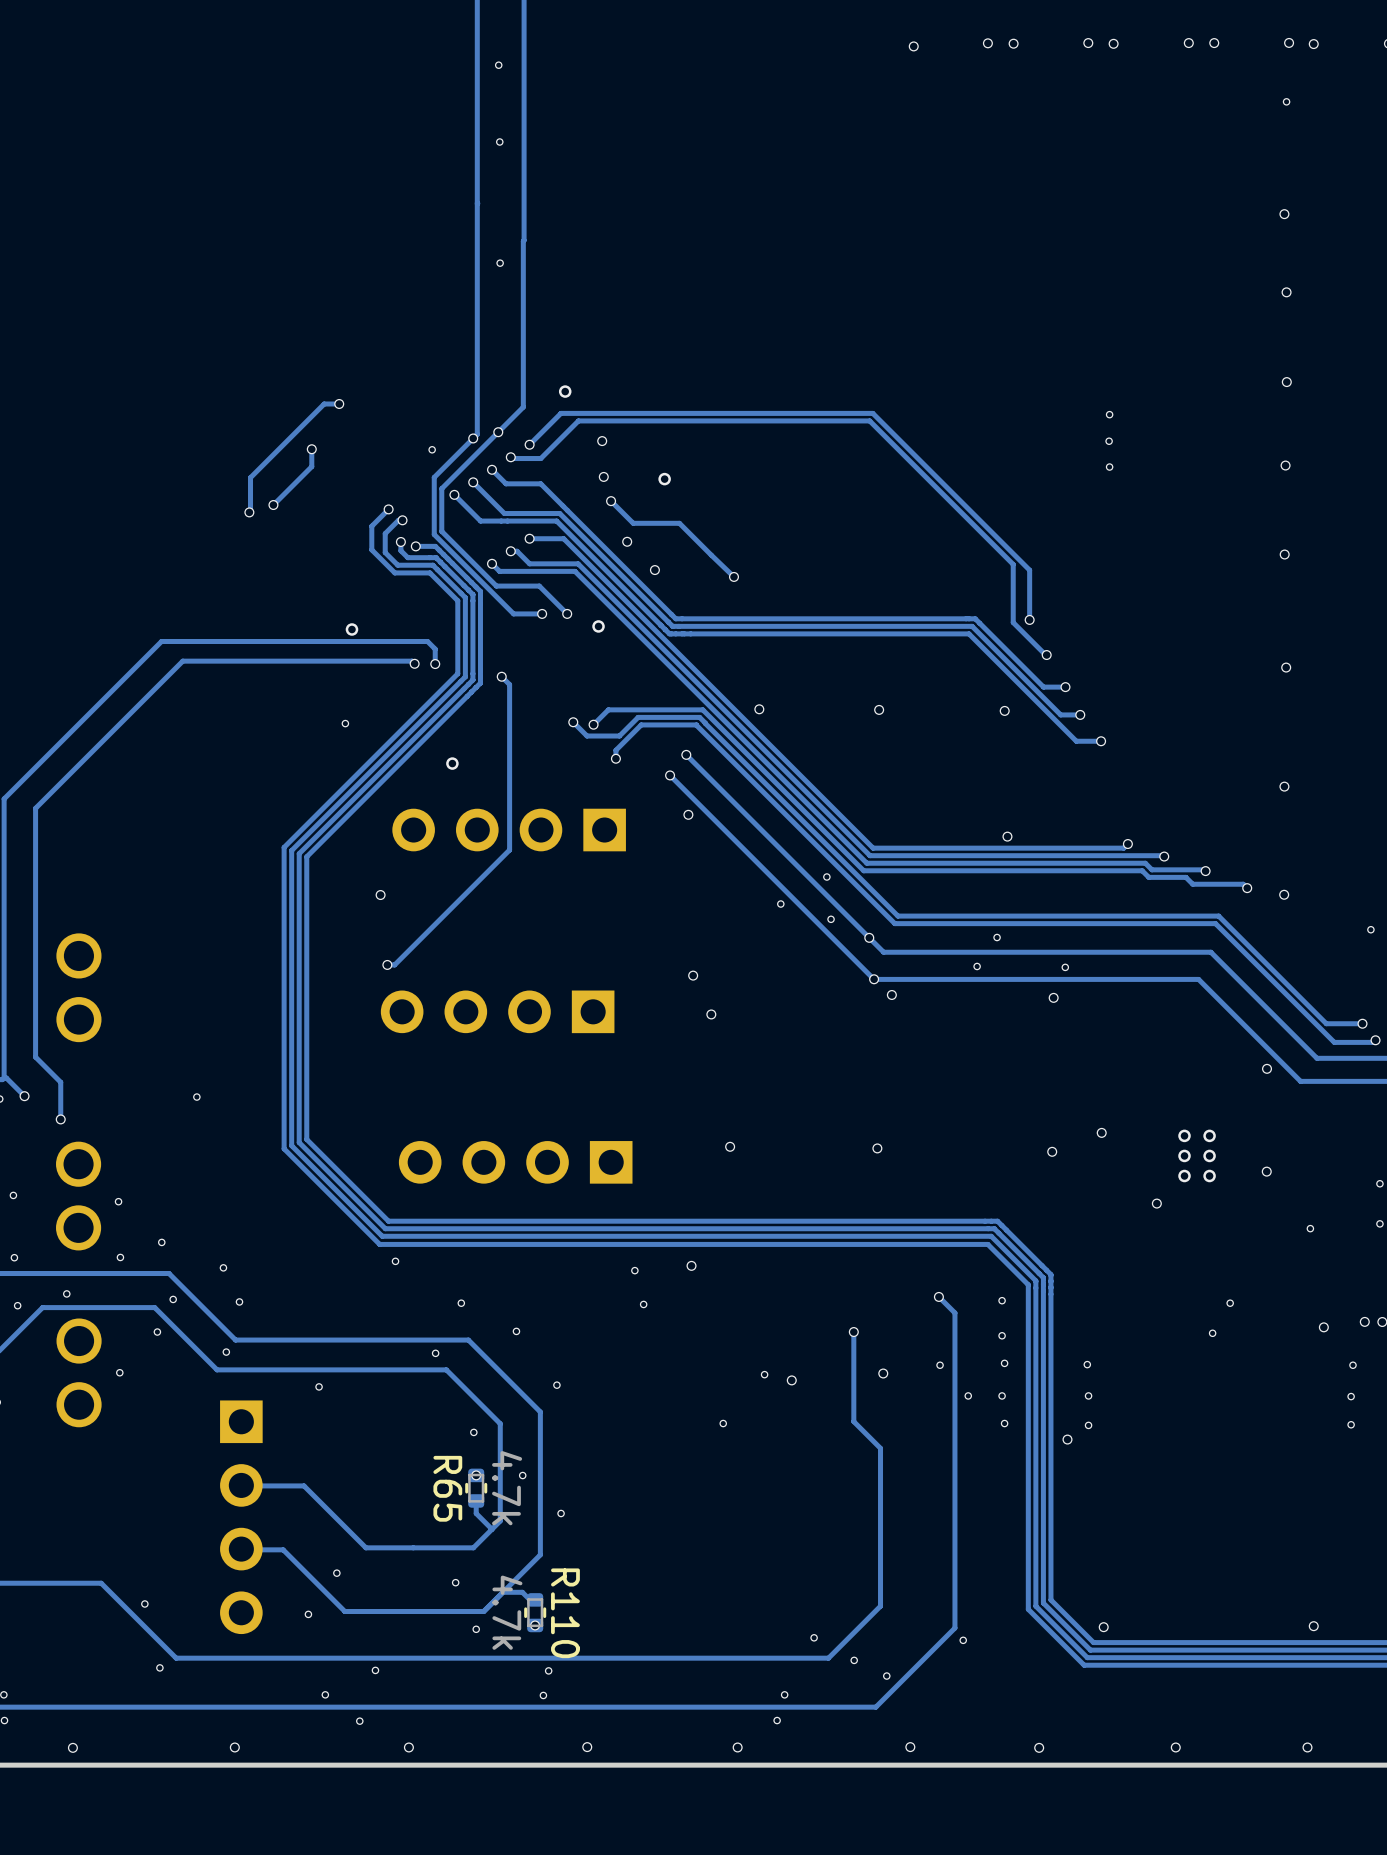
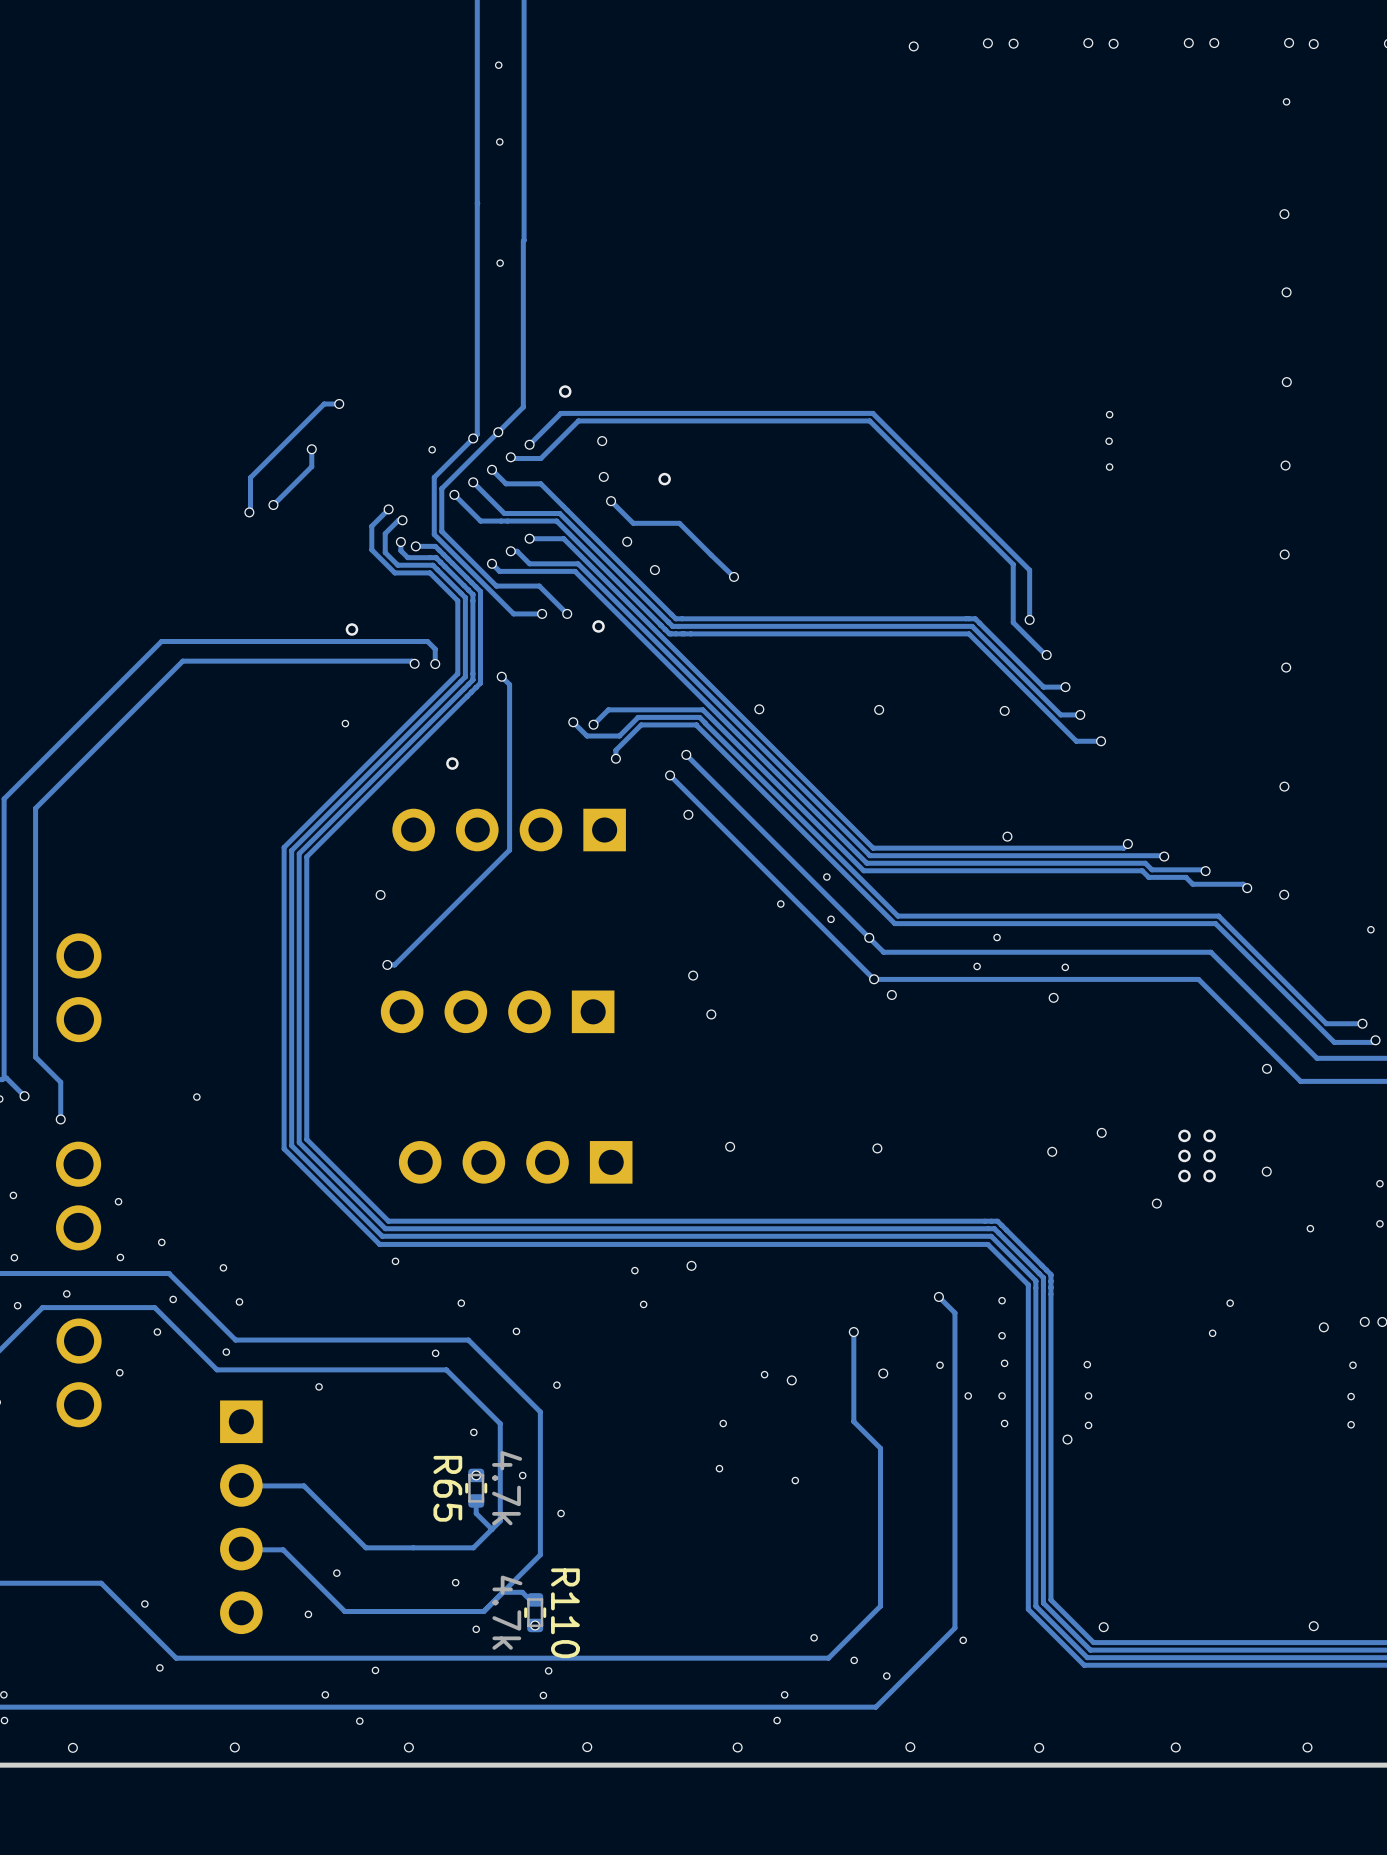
via: none -> (719, 1468)
via: none -> (795, 1480)

